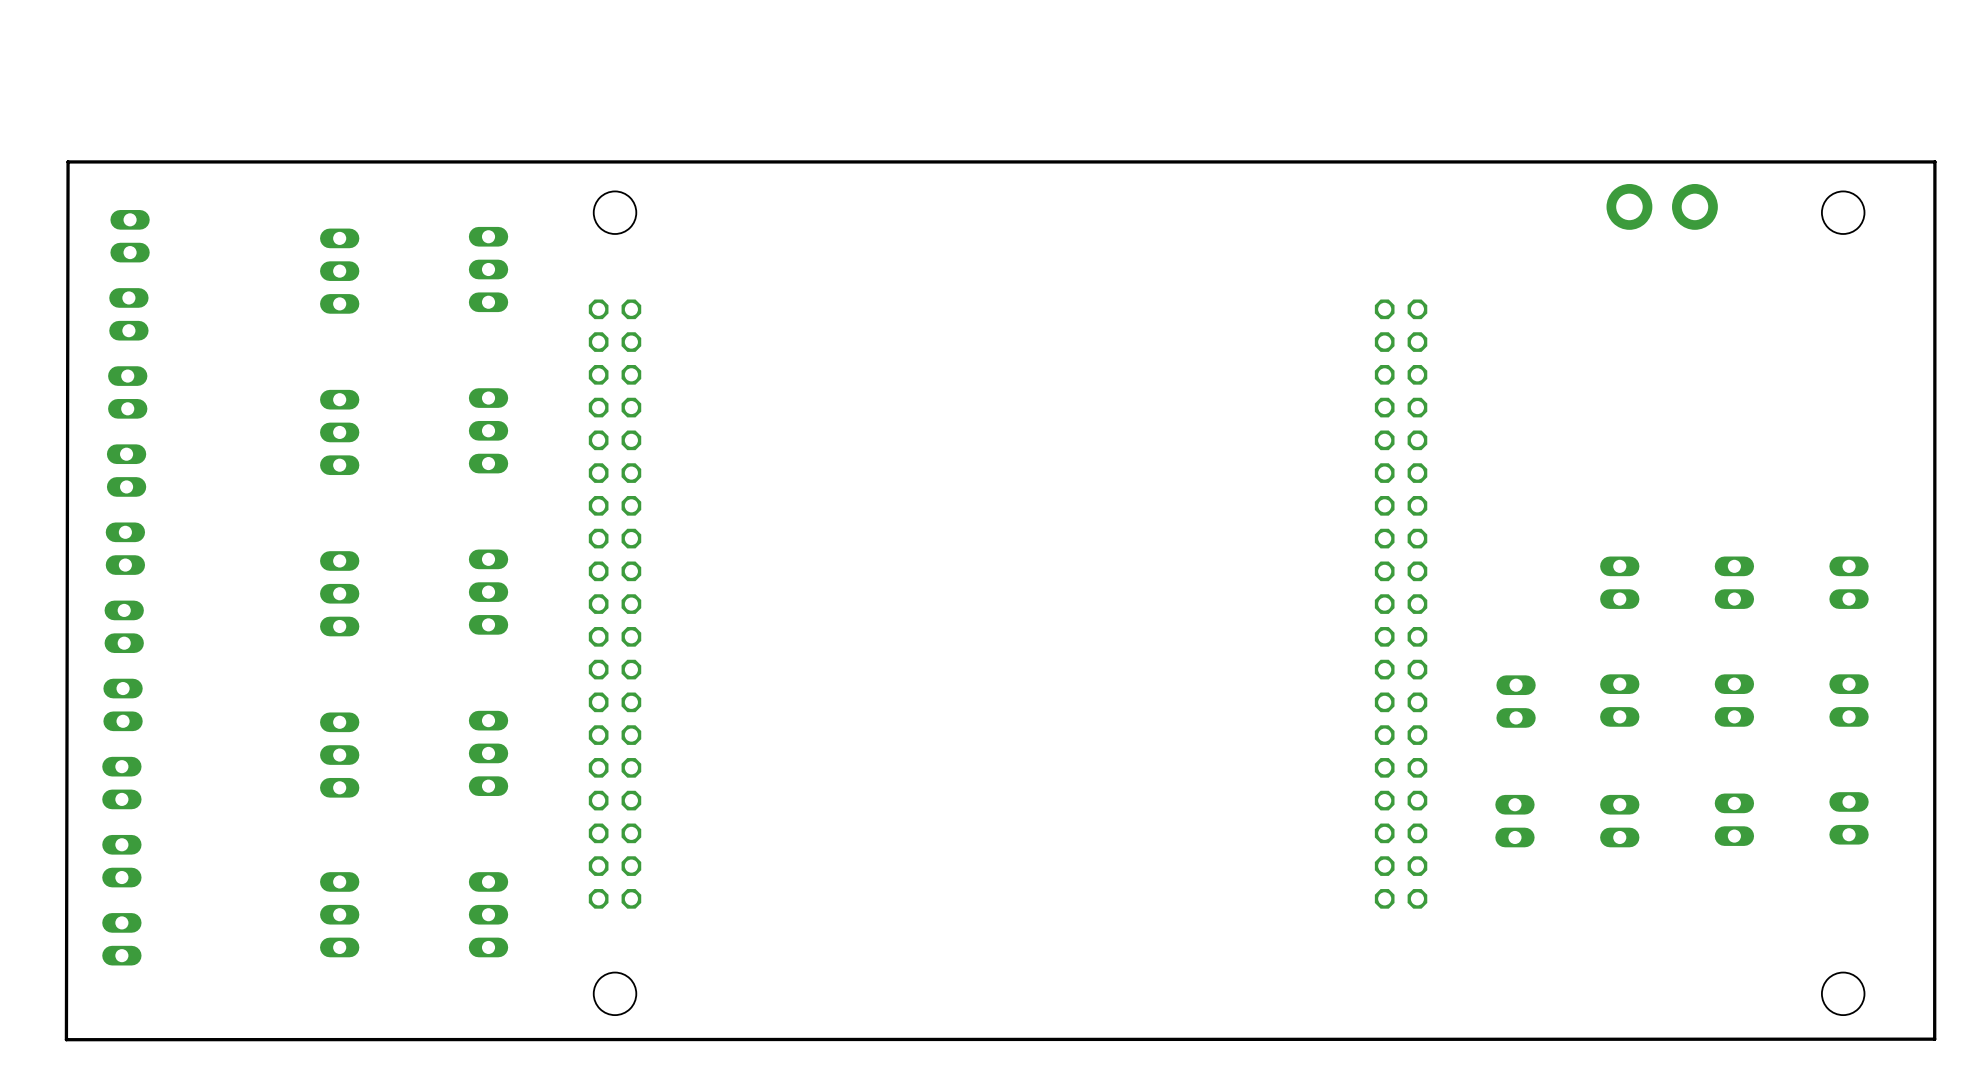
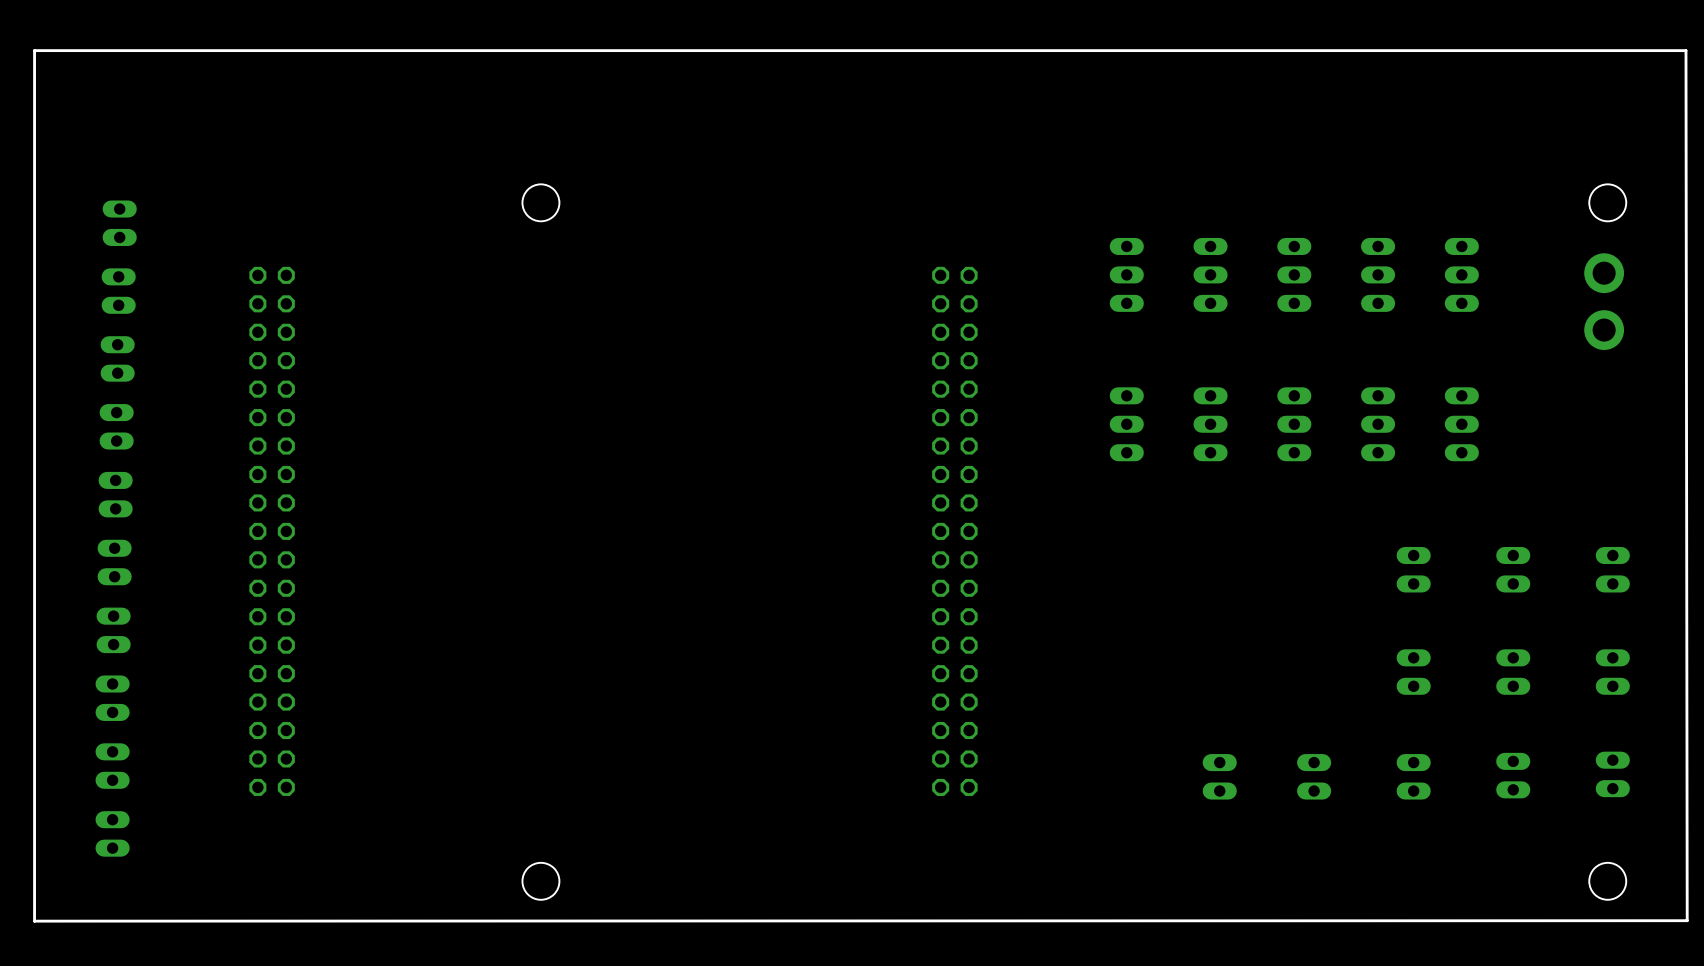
part rotation: 0° (1662, 206) -> 90° clockwise (1604, 301)
part position: (1662, 206) -> (1604, 301)
part: (488, 269) -> none
part: (339, 271) -> none
part: none -> (1126, 274)
part: none -> (1210, 274)
part: none -> (1294, 274)
part: none -> (1378, 274)
part: none -> (1461, 274)
part: (488, 430) -> none
part: (339, 432) -> none
part: none -> (1126, 424)
part: none -> (1210, 424)
part: none -> (1294, 424)
part: none -> (1378, 424)
part: none -> (1461, 424)
part: (1619, 582) -> none
part: (1734, 582) -> none
part: (1849, 582) -> none
part: none -> (272, 531)
part: none -> (954, 531)
part: (488, 592) -> none
part: (339, 593) -> none
part: (615, 604) -> none
part: (1401, 604) -> none
part: none -> (1413, 569)
part: none -> (1513, 569)
part: none -> (1612, 569)
part: (1619, 700) -> none
part: (1734, 700) -> none
part: (1849, 700) -> none
part: (1516, 701) -> none
part: none -> (1413, 672)
part: none -> (1513, 672)
part: none -> (1612, 672)
part: (488, 753) -> none
part: (339, 755) -> none
part: (1849, 818) -> none
part: (1734, 819) -> none
part position: (1514, 821) -> (1314, 776)
part: (1619, 821) -> none
part: none -> (1612, 774)
part: none -> (1513, 775)
part: none -> (1219, 776)
part: none -> (1413, 776)
part: (339, 914) -> none
part: (488, 914) -> none
board edge: (1934, 1039) (1934, 161) (68, 161) (66, 1039) -> (1687, 920) (1685, 50) (34, 50) (34, 921) (64, 921)

